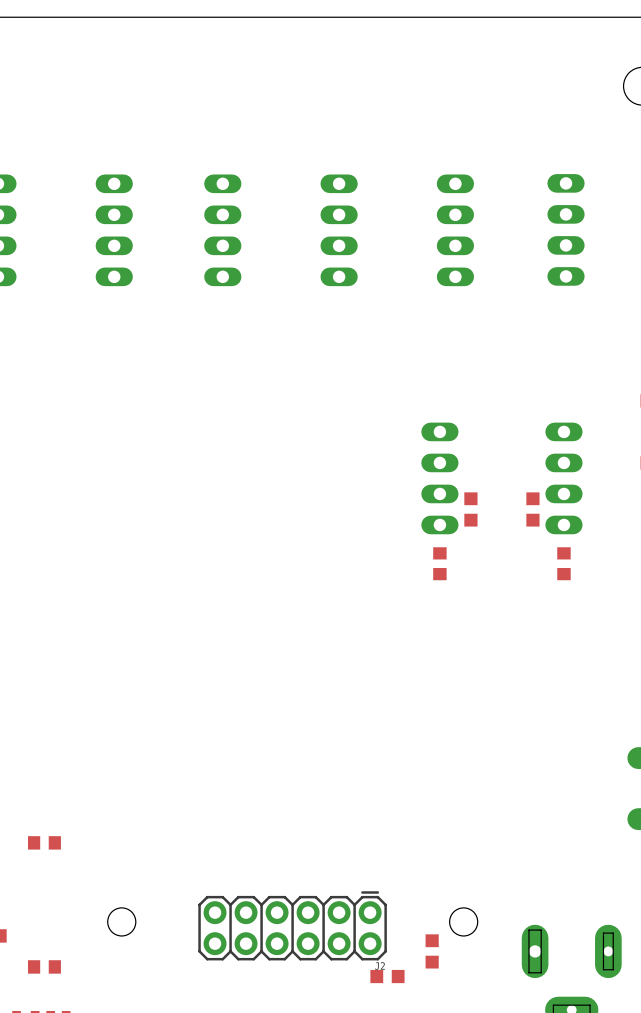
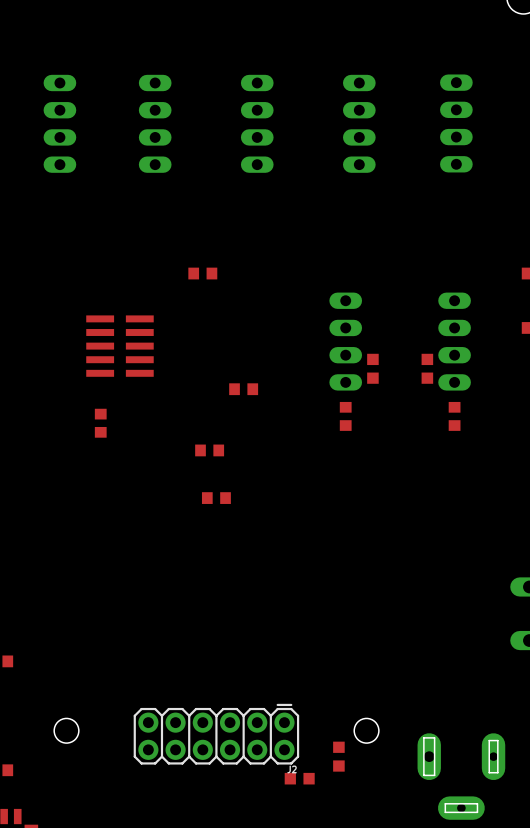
part: none -> (202, 273)
part: none -> (119, 346)
part: none -> (243, 389)
part: none -> (100, 423)
part: none -> (209, 450)
part: none -> (216, 498)

